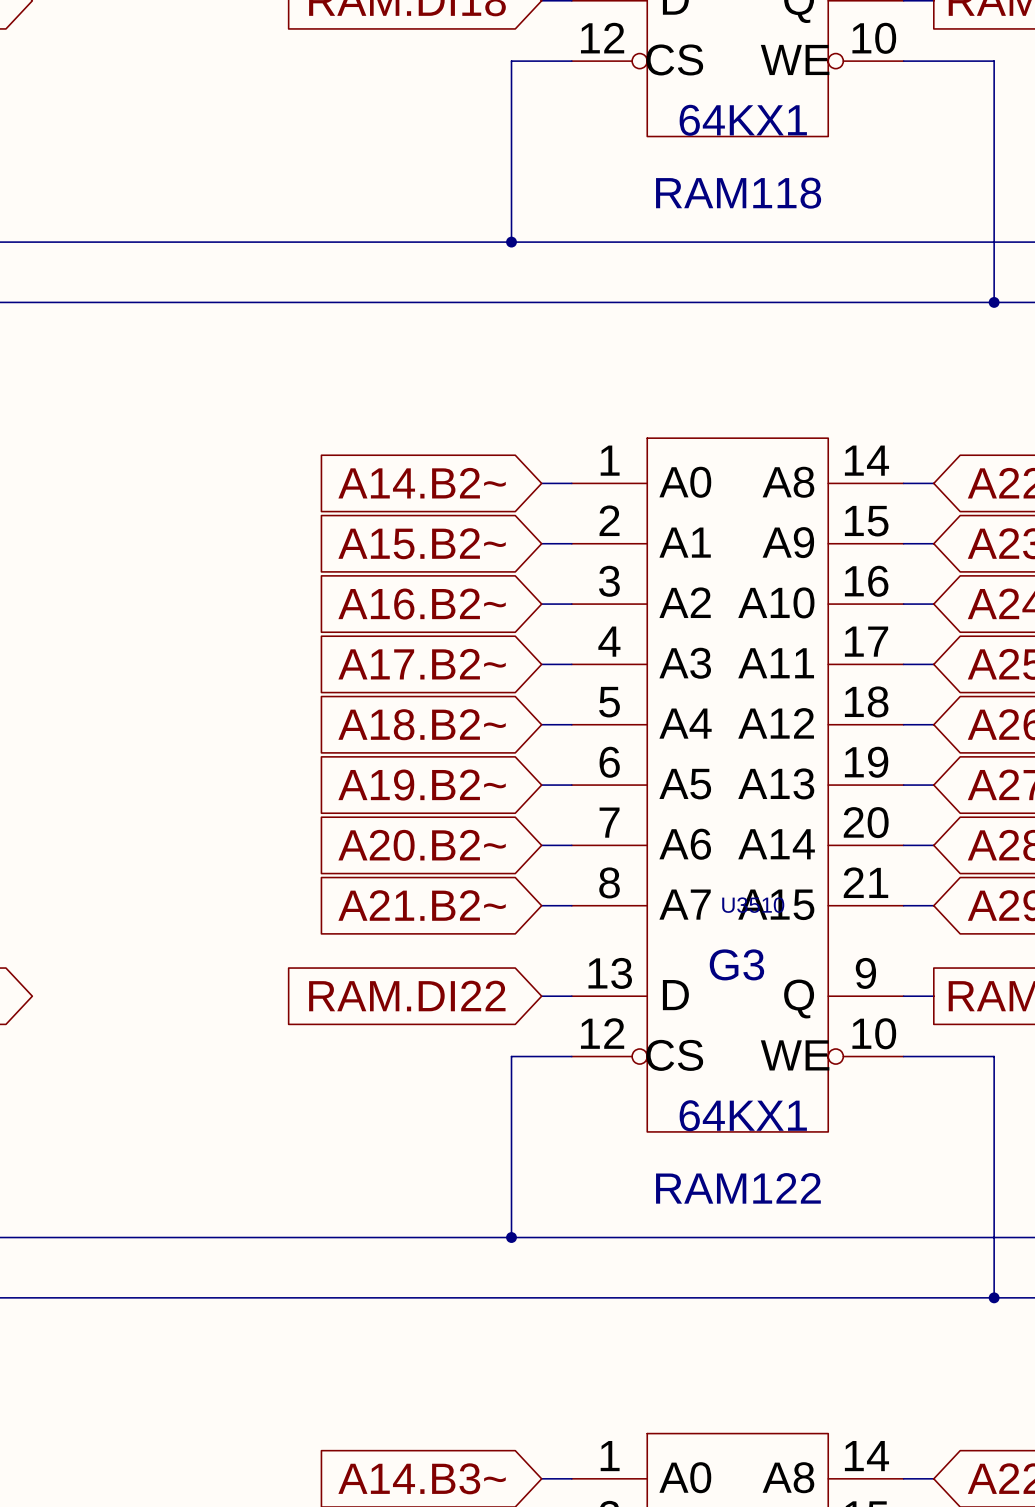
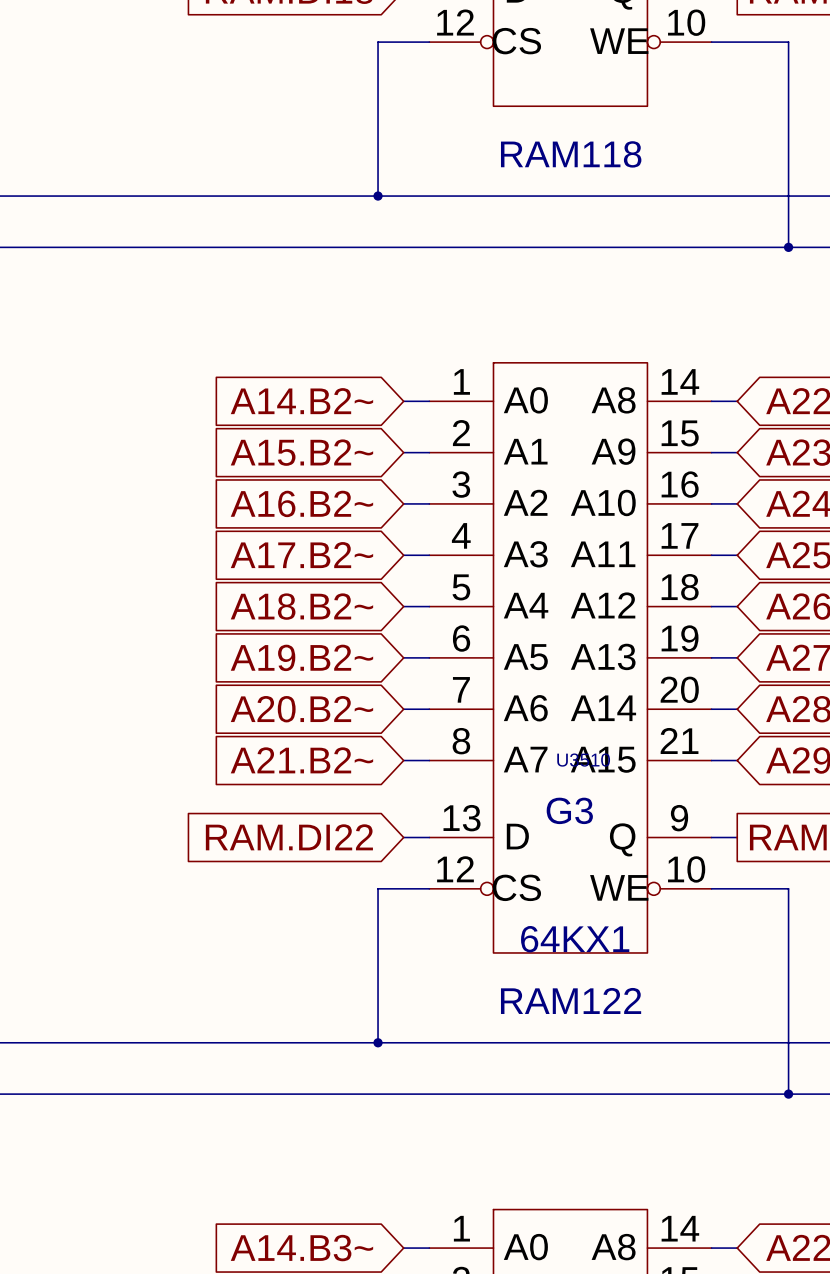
part value: 64KX1 (743, 120) -> none

